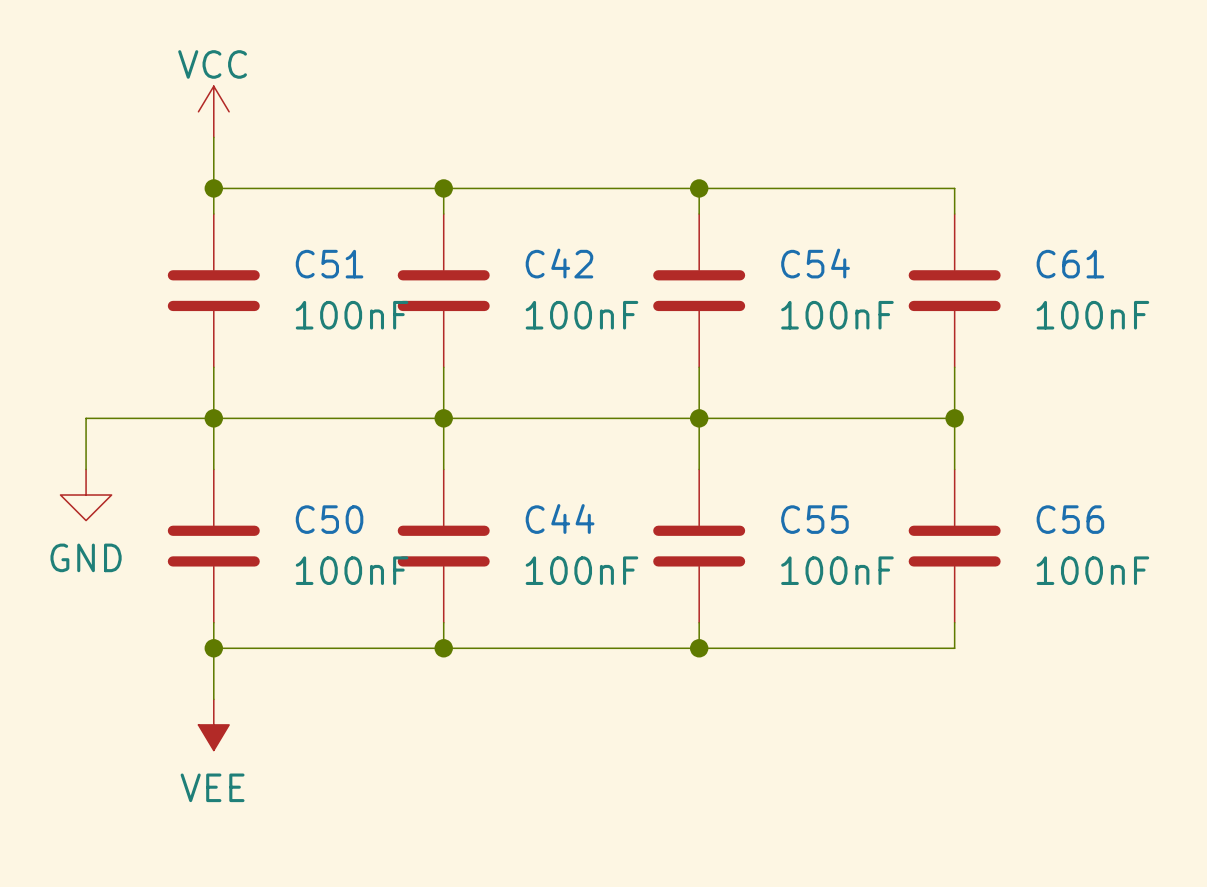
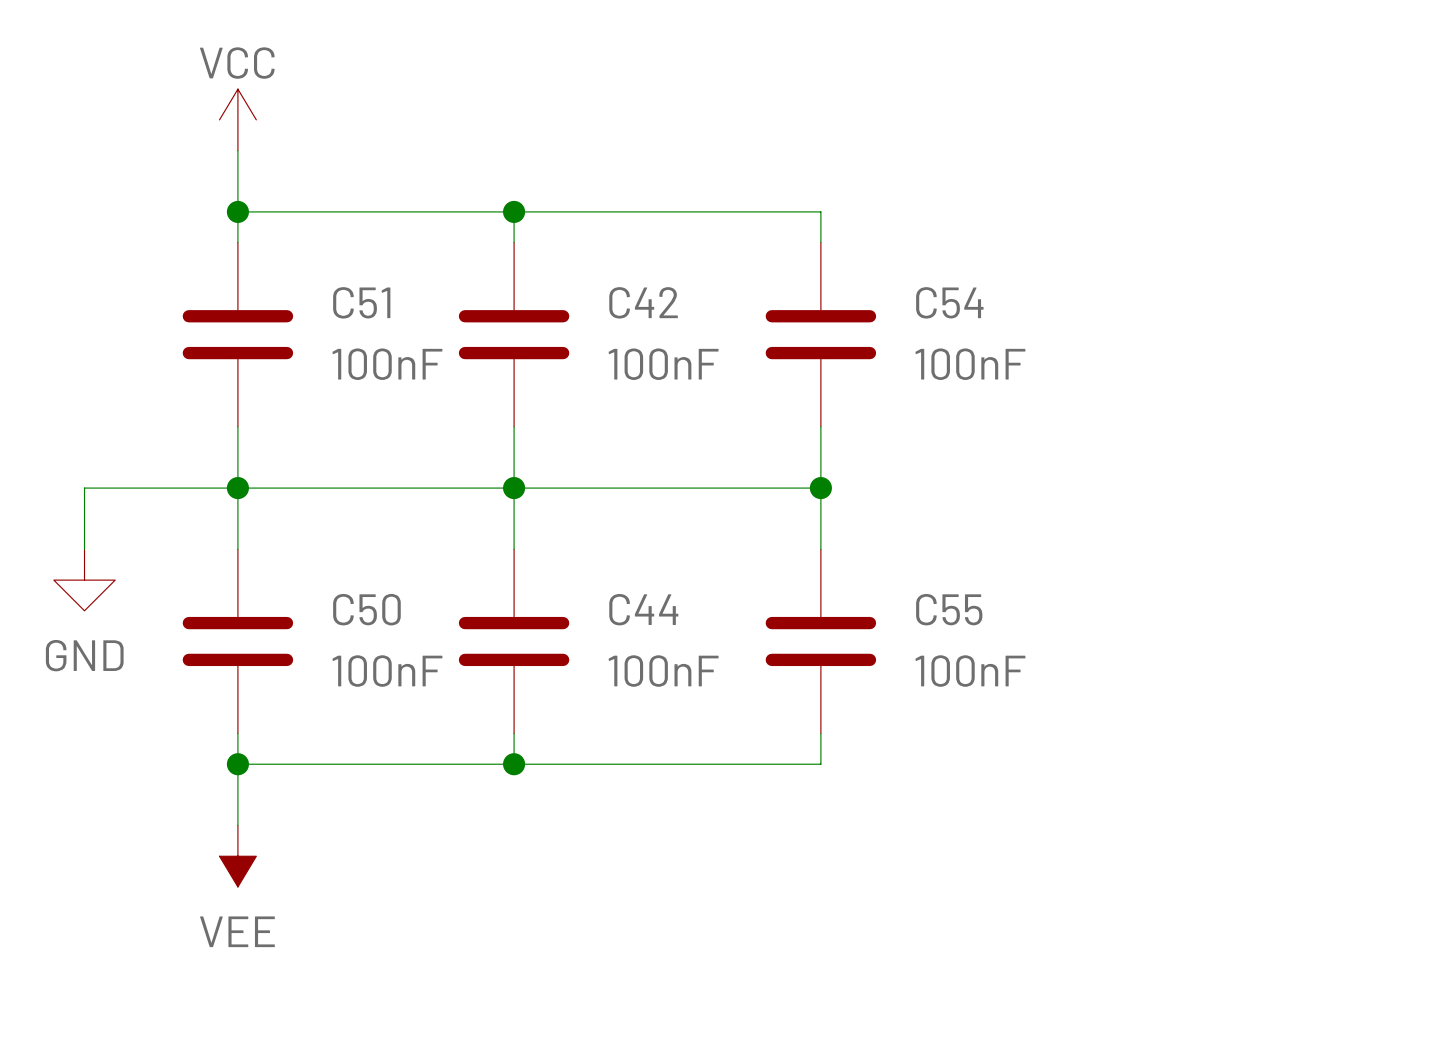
wire: (699, 188) (954, 188) (954, 213) -> none
junction: (699, 188) -> none
C61: 100nF (954, 290) -> none
wire: (954, 367) (954, 469) -> none
wire: (699, 418) (954, 418) -> none
junction: (954, 418) -> none
C56: 100nF (954, 546) -> none
wire: (954, 622) (954, 648) (699, 648) -> none
junction: (699, 648) -> none

